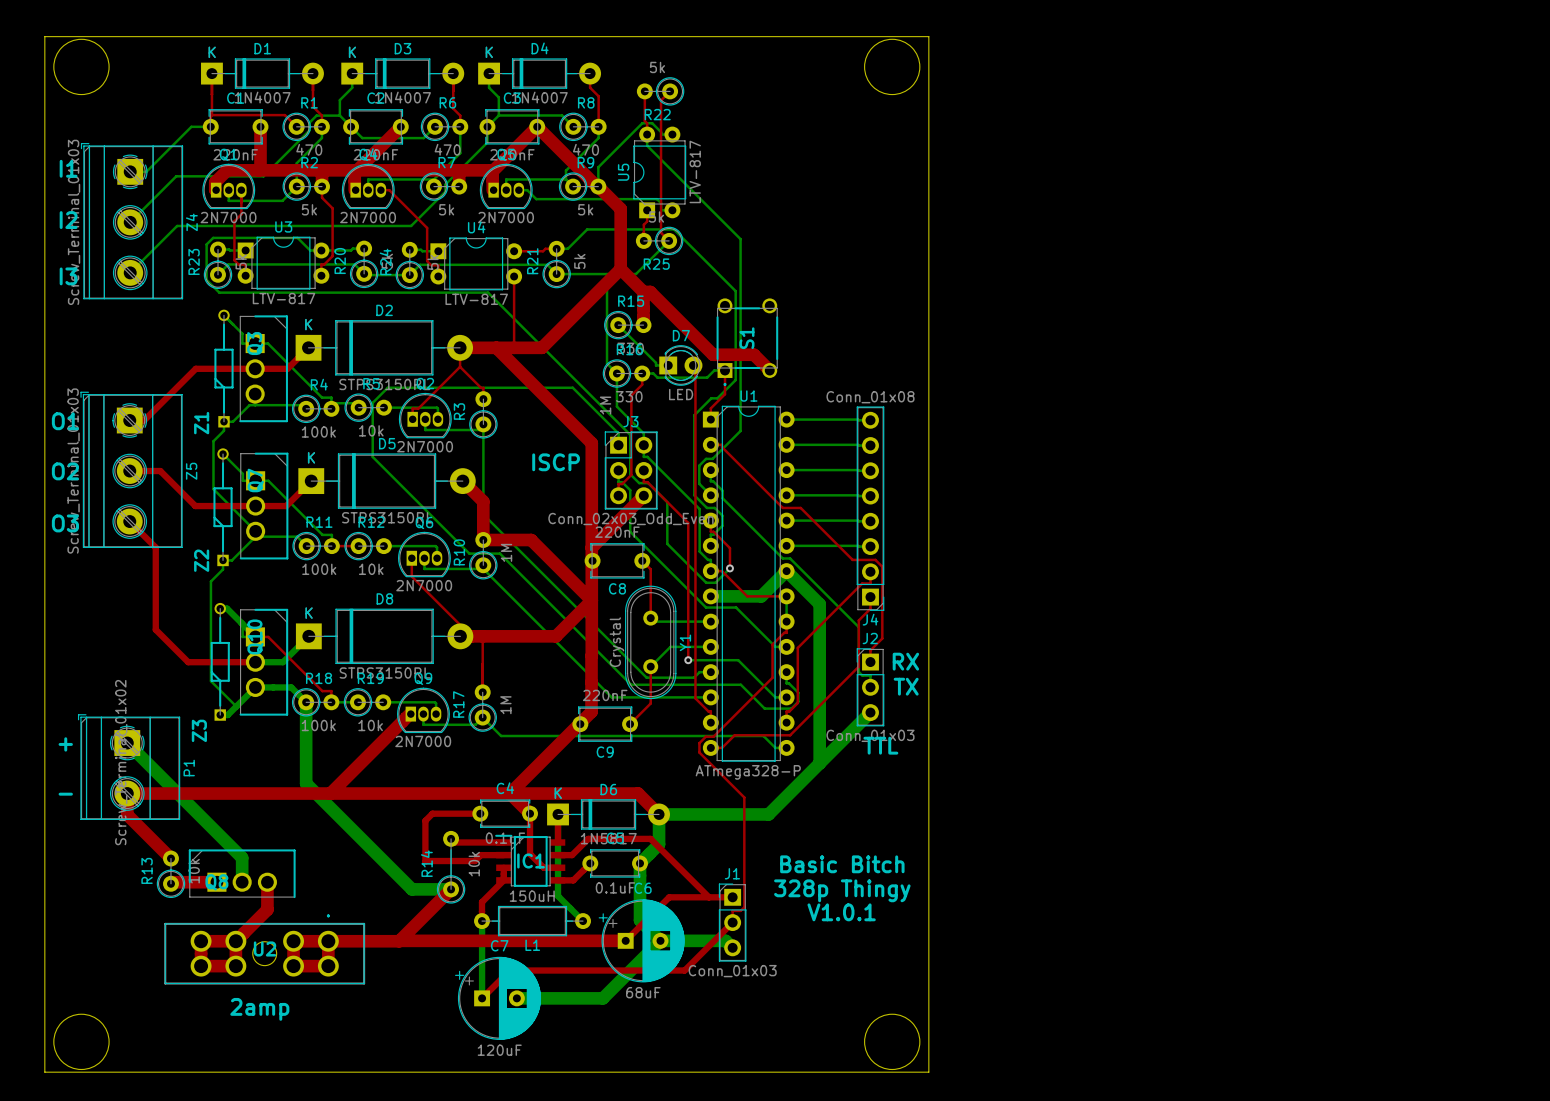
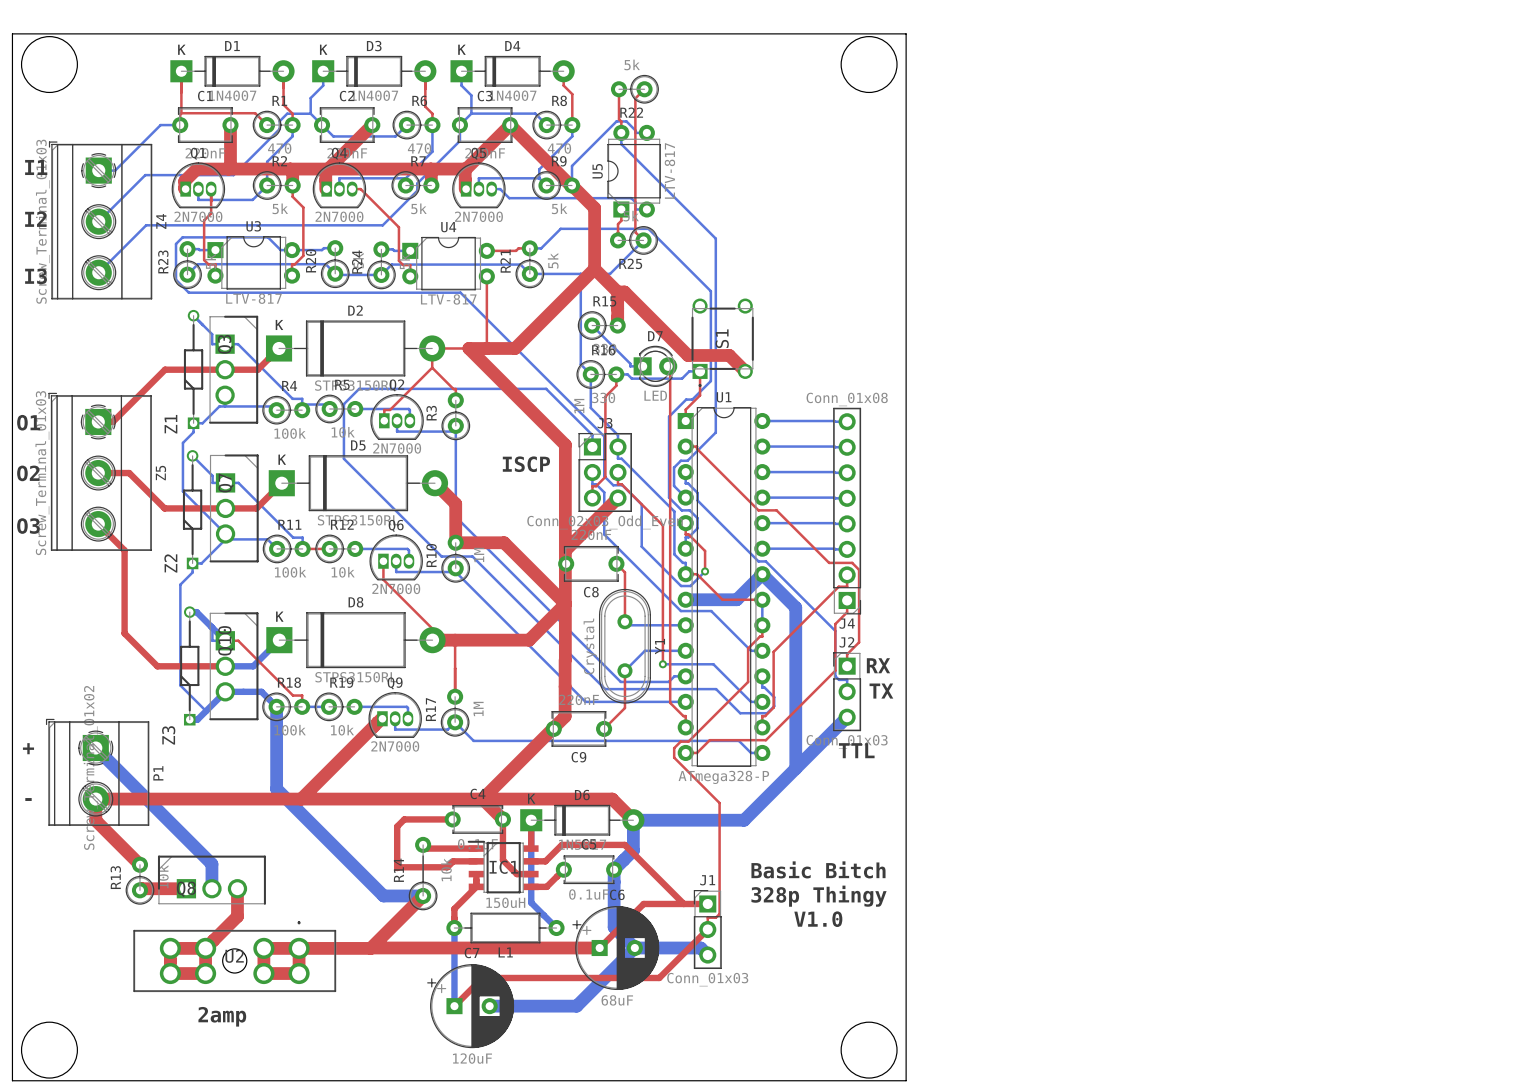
top track width: thick (460, 347) (496, 347) -> thin (432, 348) (468, 348)
text: V1.0.1 (841, 912) -> V1.0 (818, 919)

